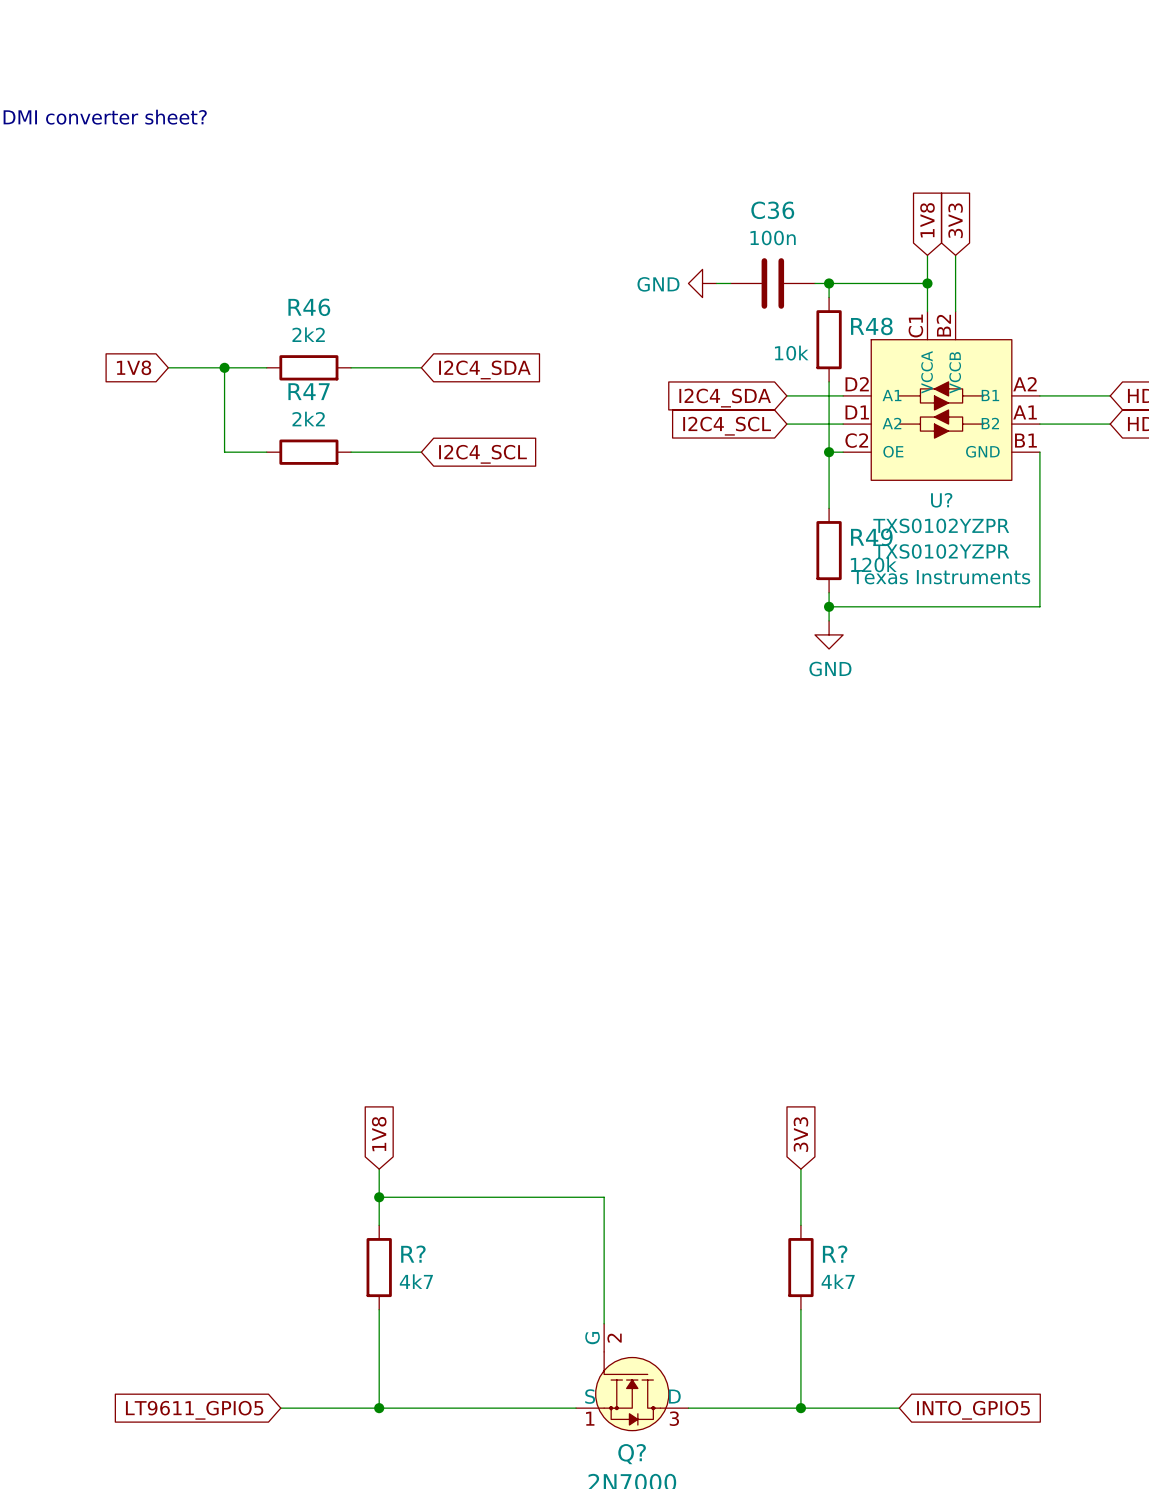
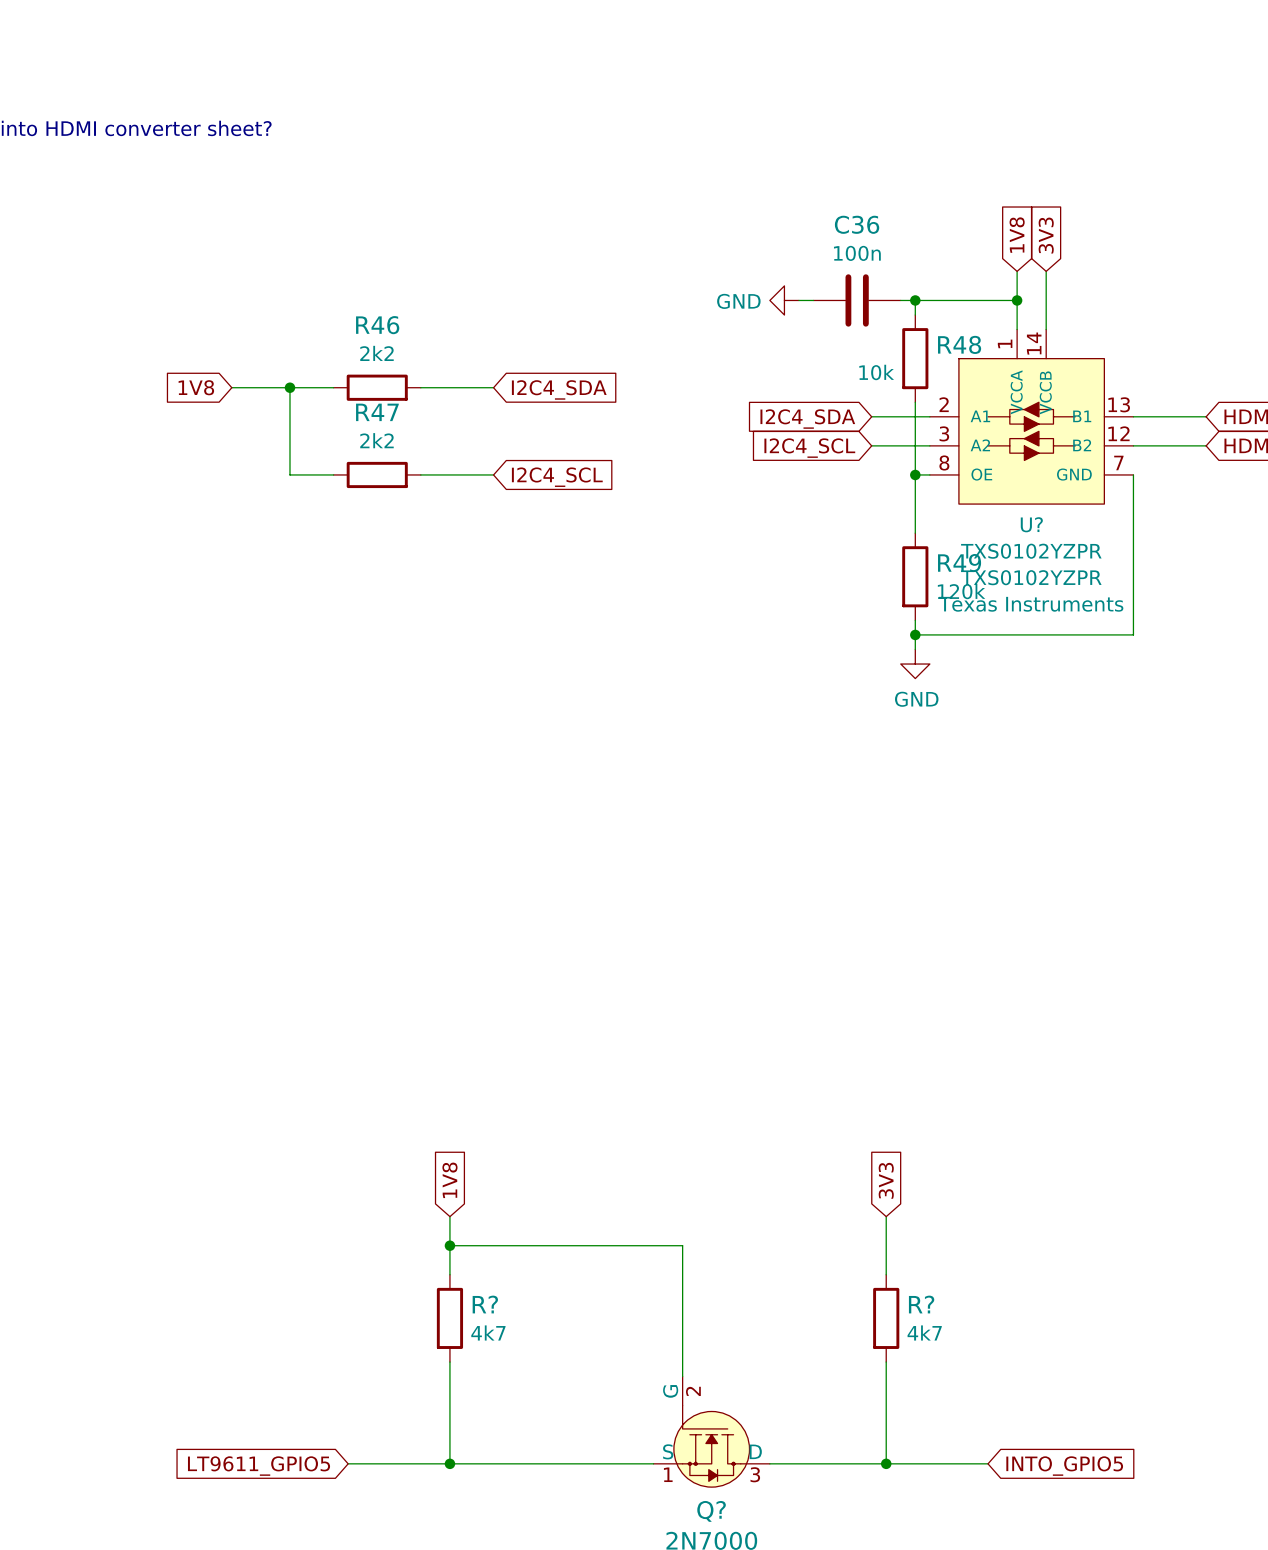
U? pin number: B2 (943, 325) -> 14 (1034, 343)
U? pin number: C1 (915, 326) -> 1 (1005, 343)
U? pin number: D2 (857, 384) -> 2 (944, 404)
U? pin number: A2 (1024, 384) -> 13 (1119, 404)
U? pin number: D1 (857, 412) -> 3 (944, 433)
U? pin number: A1 (1025, 412) -> 12 (1118, 433)
U? pin number: C2 (856, 440) -> 8 (944, 462)
U? pin number: B1 (1025, 440) -> 7 (1118, 462)

